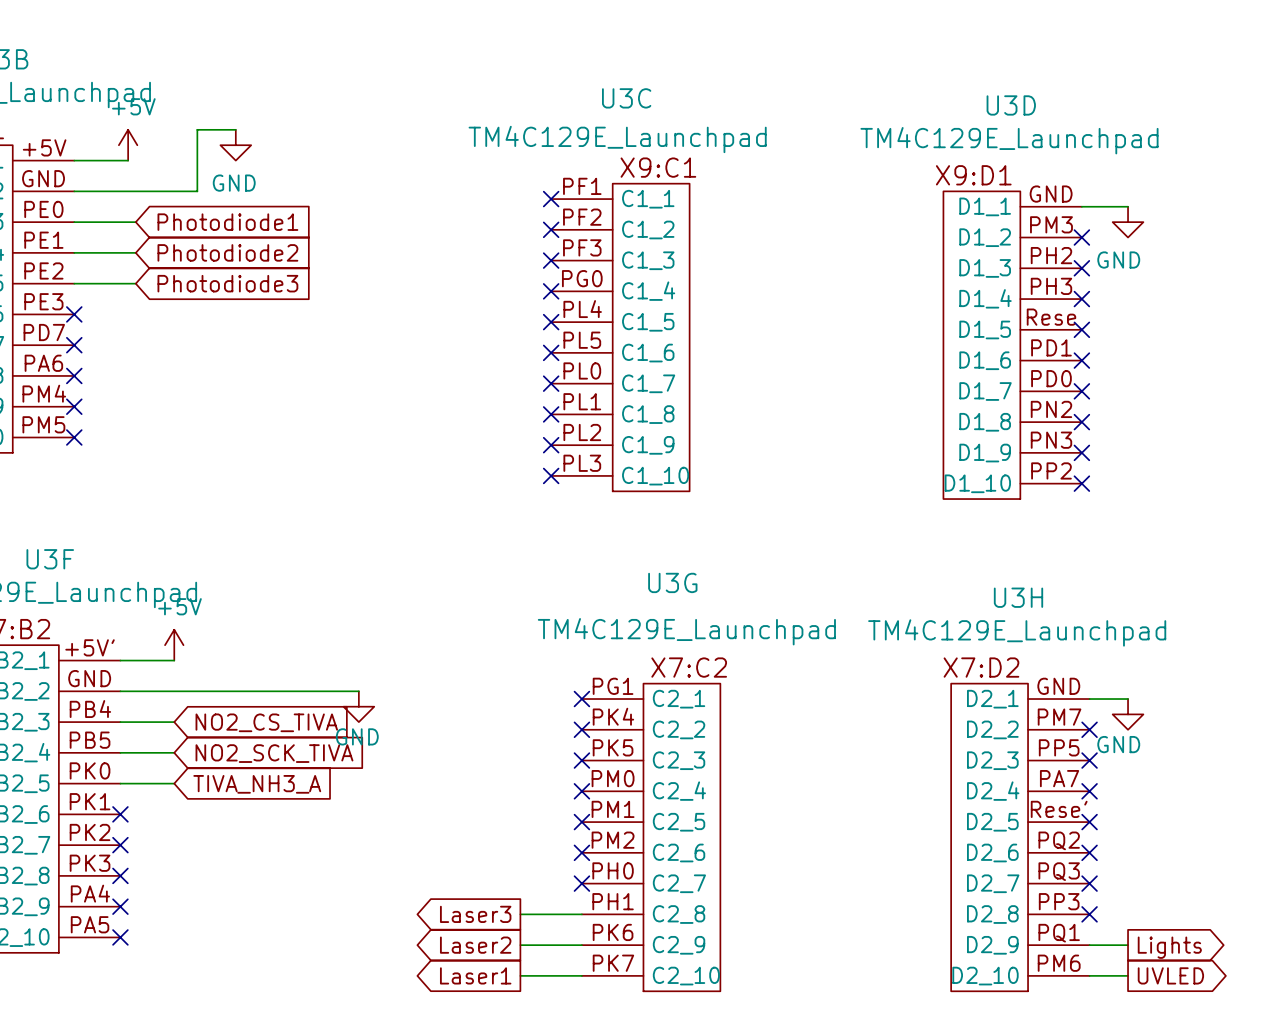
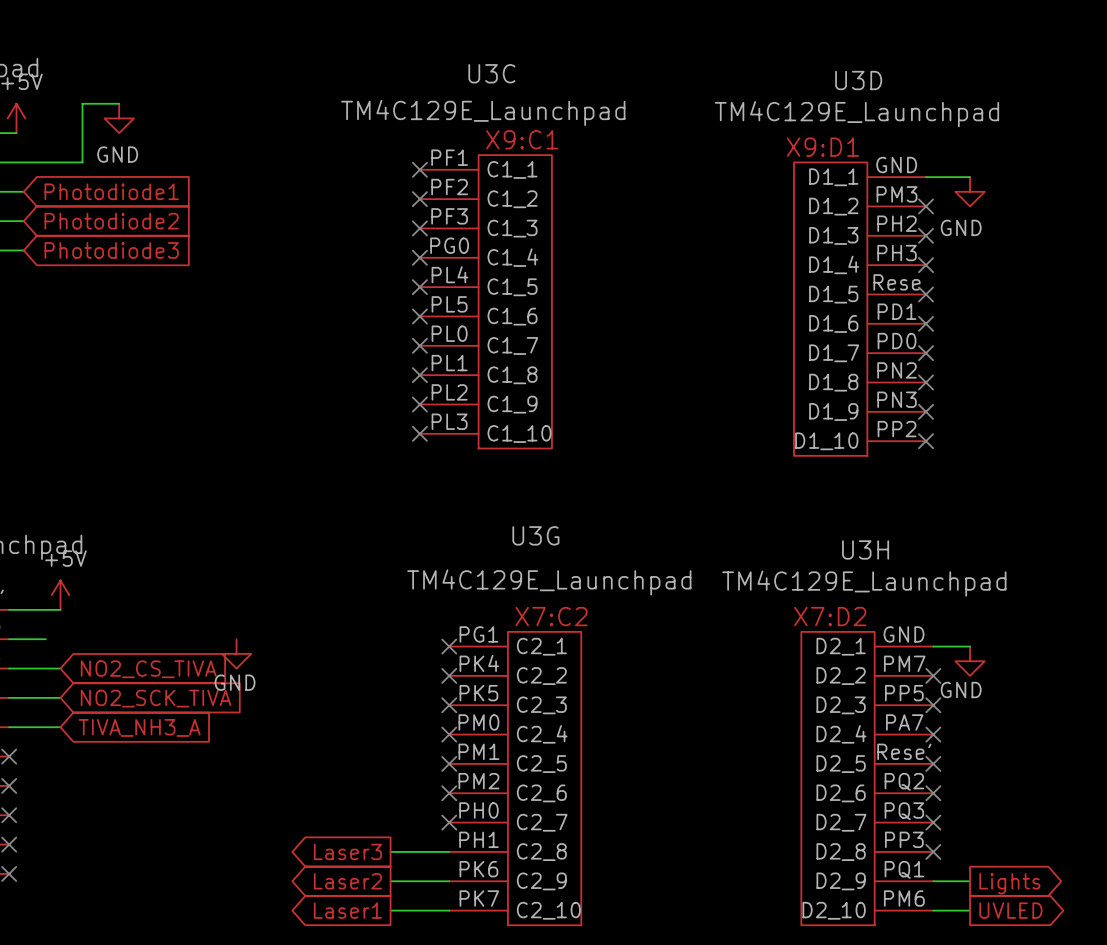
wire: (158, 691) (358, 691) -> none

